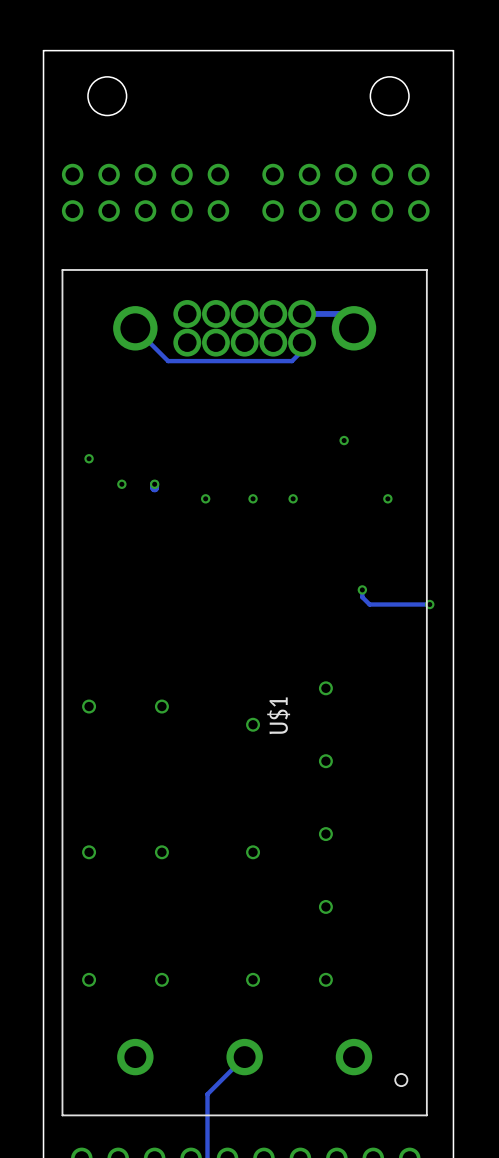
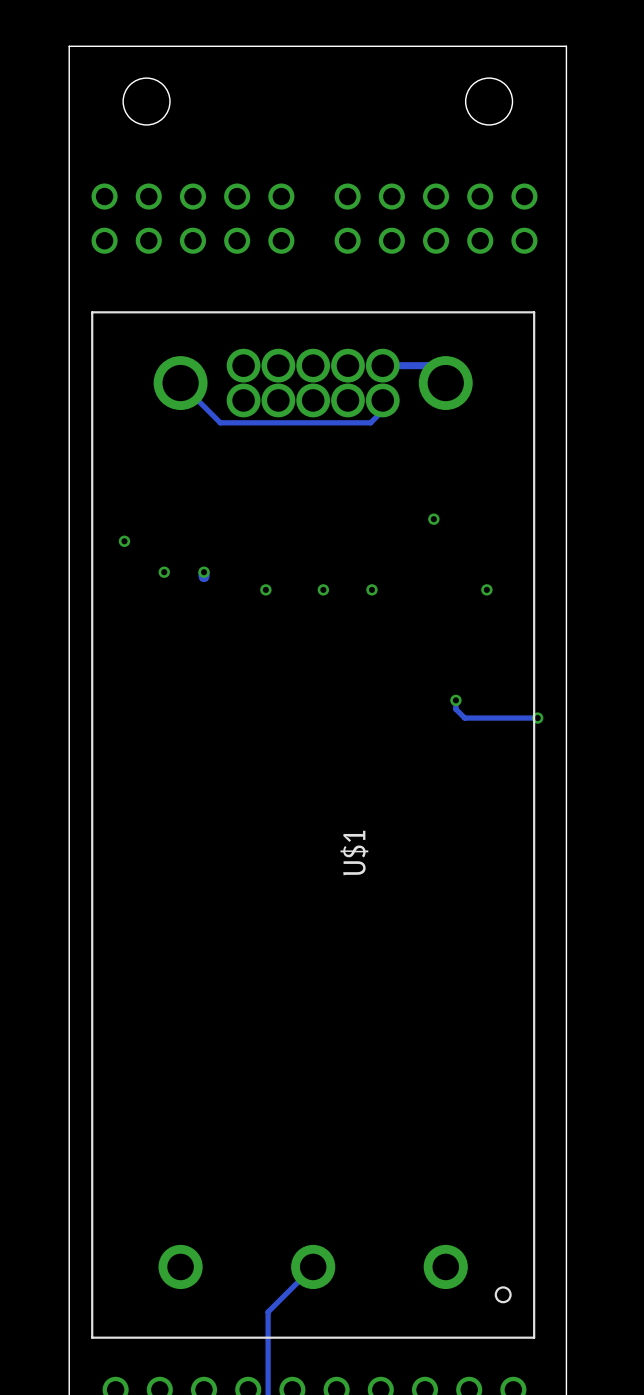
via: (325, 688) -> none
via: (89, 706) -> none
via: (161, 706) -> none
via: (253, 724) -> none
via: (325, 761) -> none
via: (325, 834) -> none
via: (89, 852) -> none
via: (161, 852) -> none
via: (253, 852) -> none
via: (325, 906) -> none
via: (89, 979) -> none
via: (161, 979) -> none
via: (253, 979) -> none
via: (325, 979) -> none

